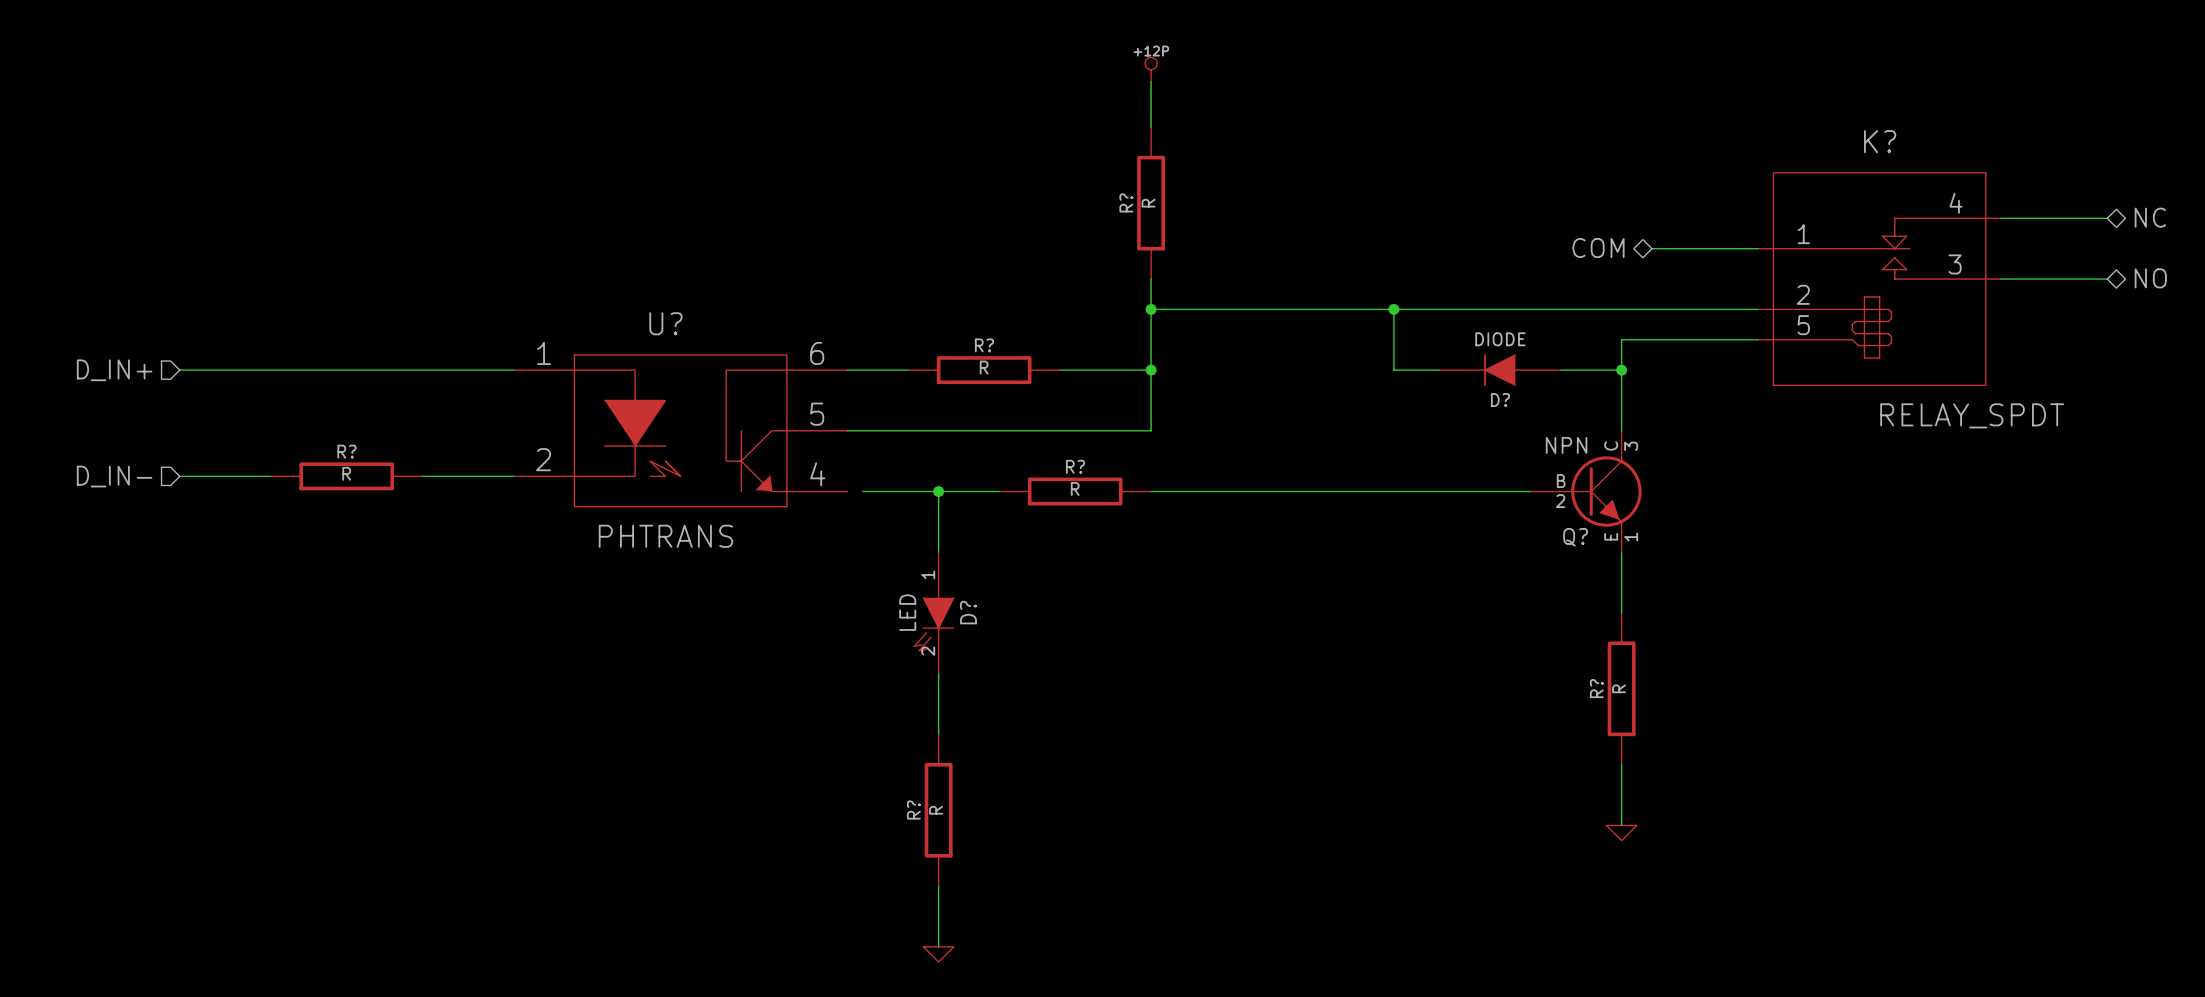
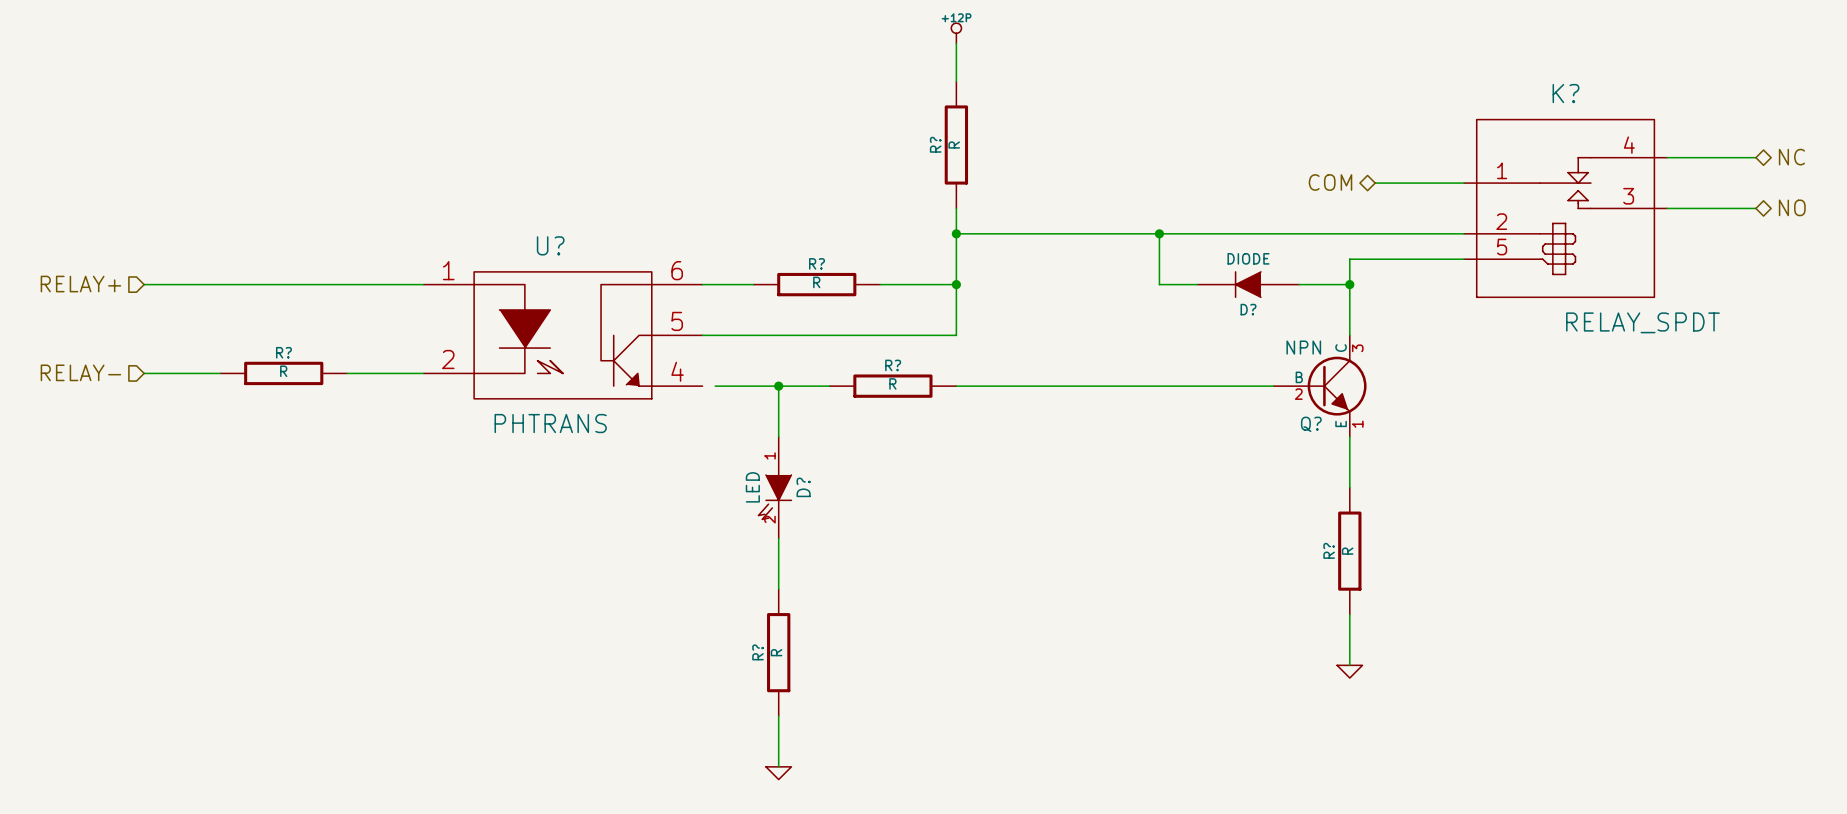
hierarchical label: D_IN+ (114, 370) -> RELAY+ (80, 284)
hierarchical label: D_IN- (114, 476) -> RELAY- (80, 372)

